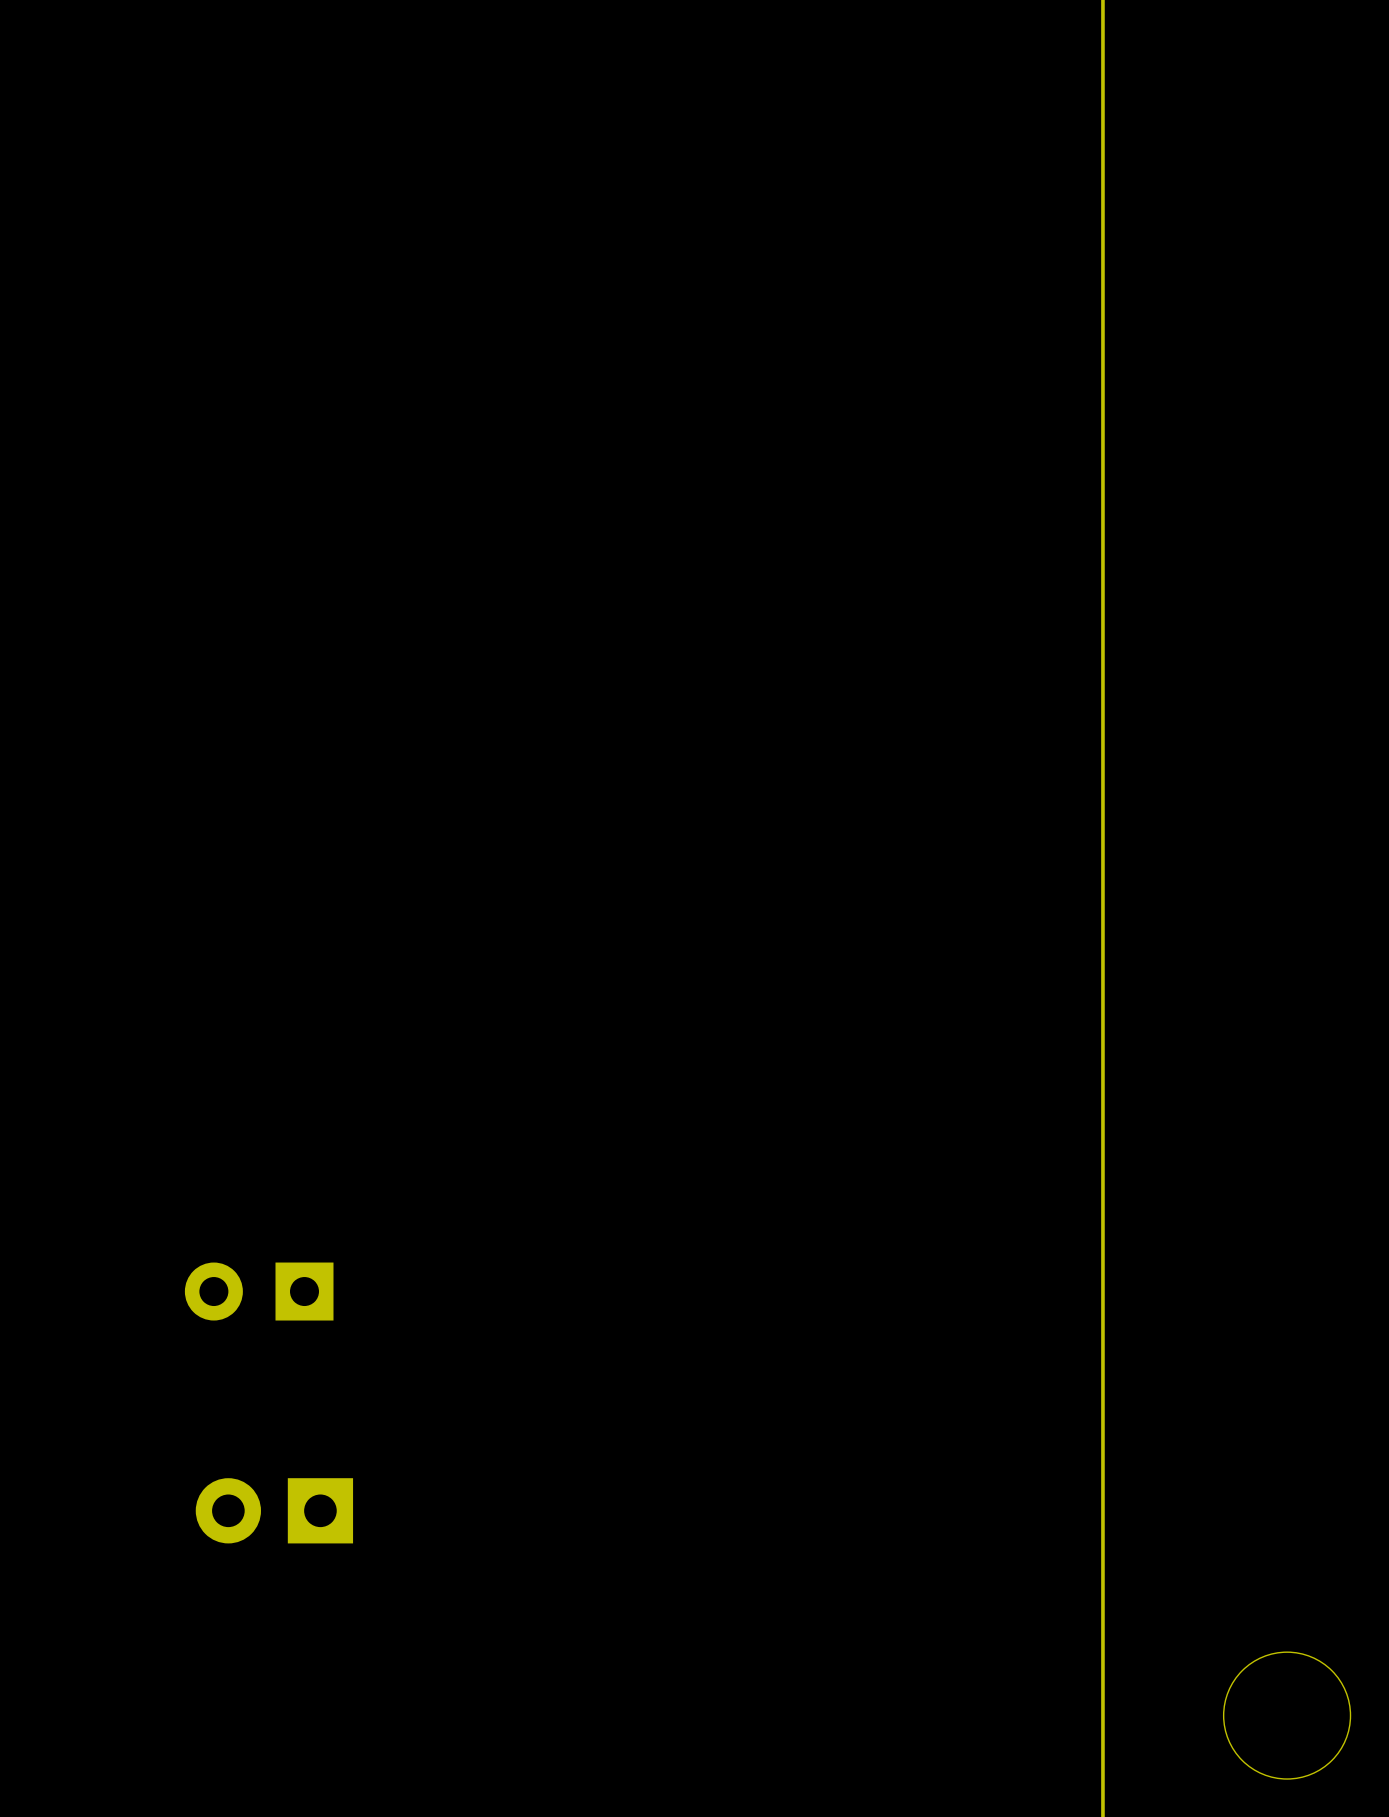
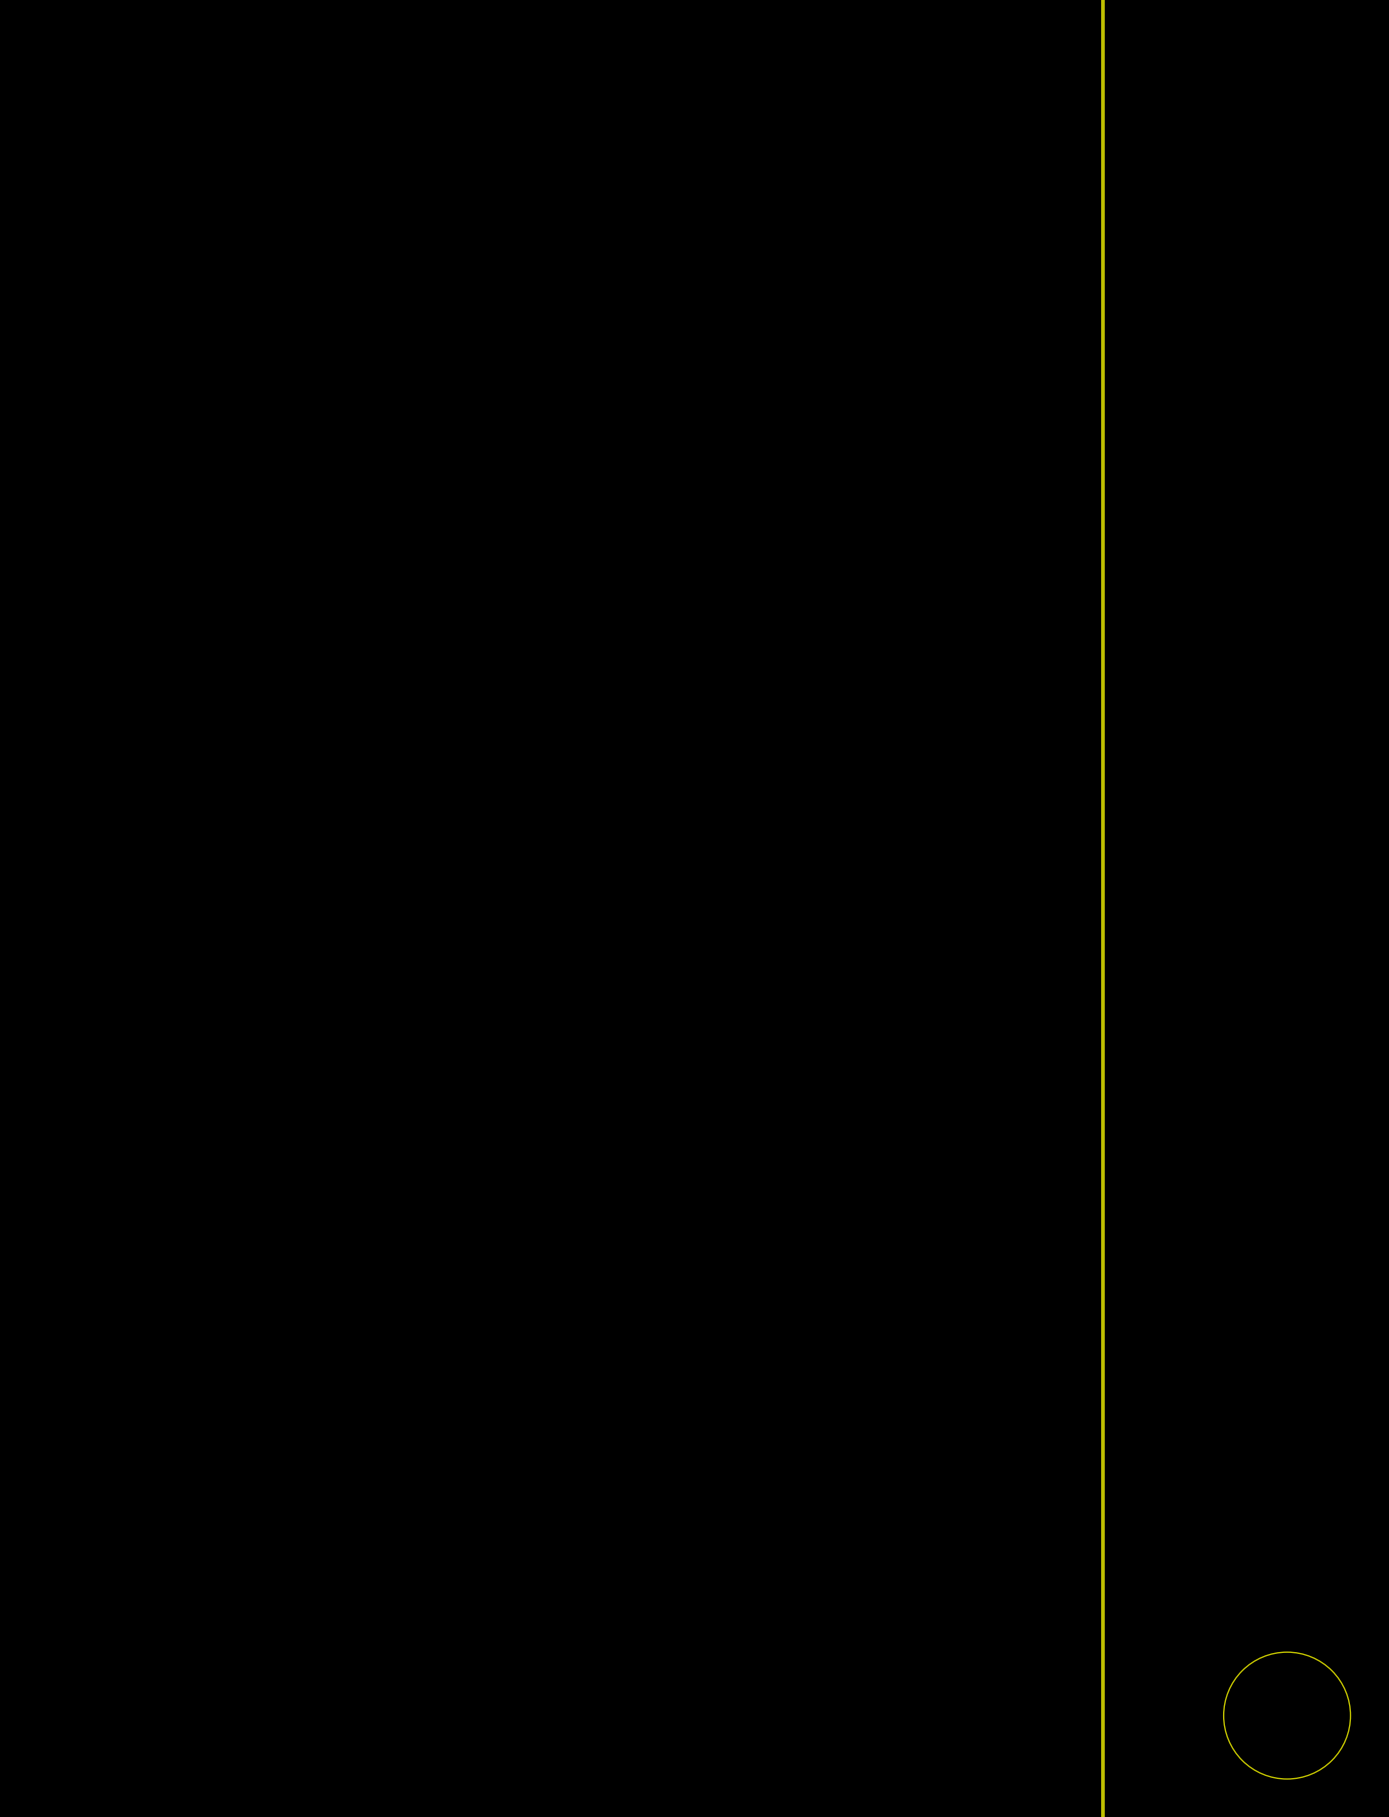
part: (259, 1291) -> none
part: (274, 1510) -> none

